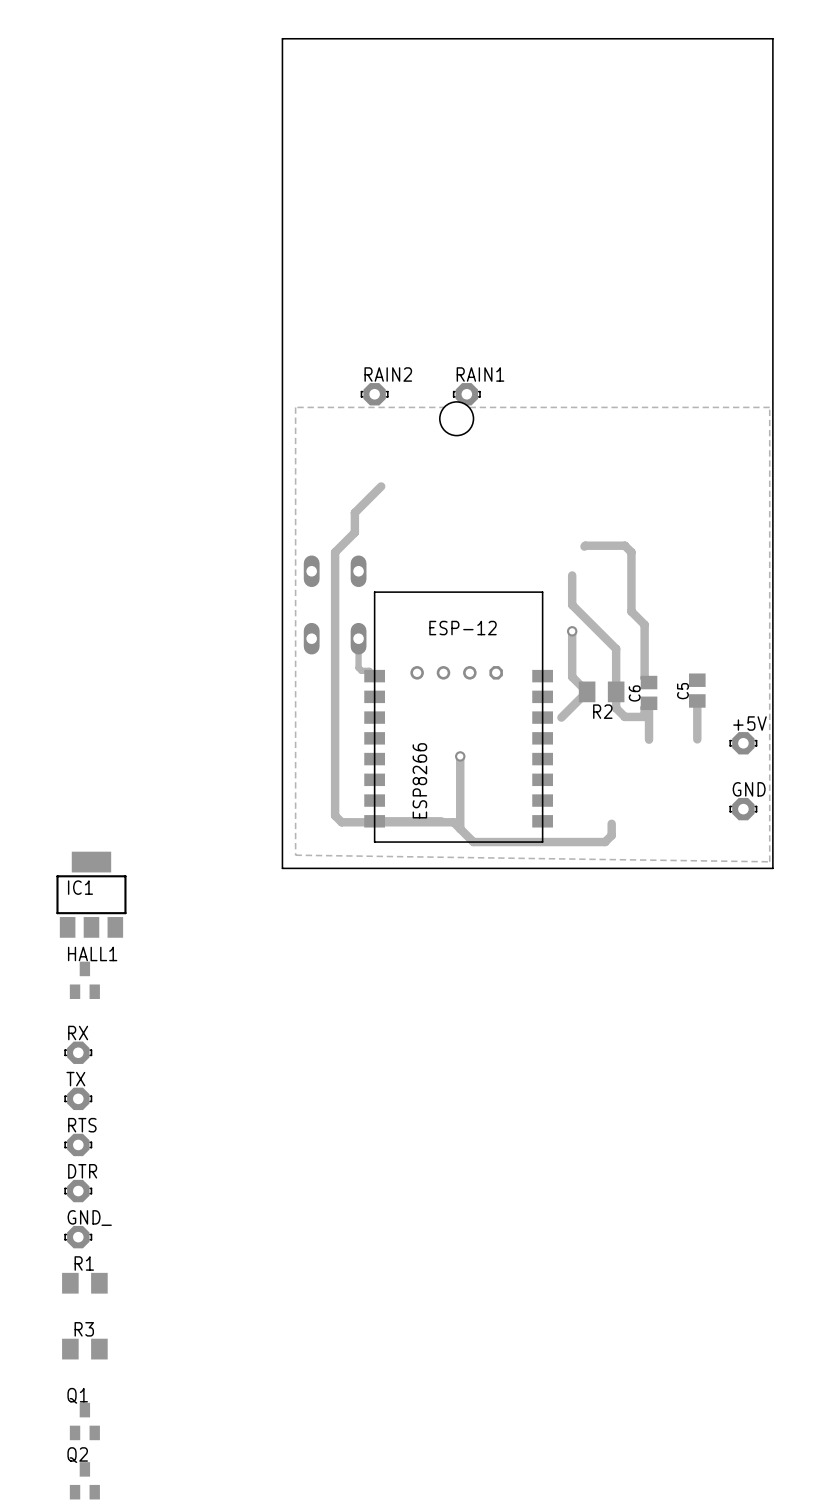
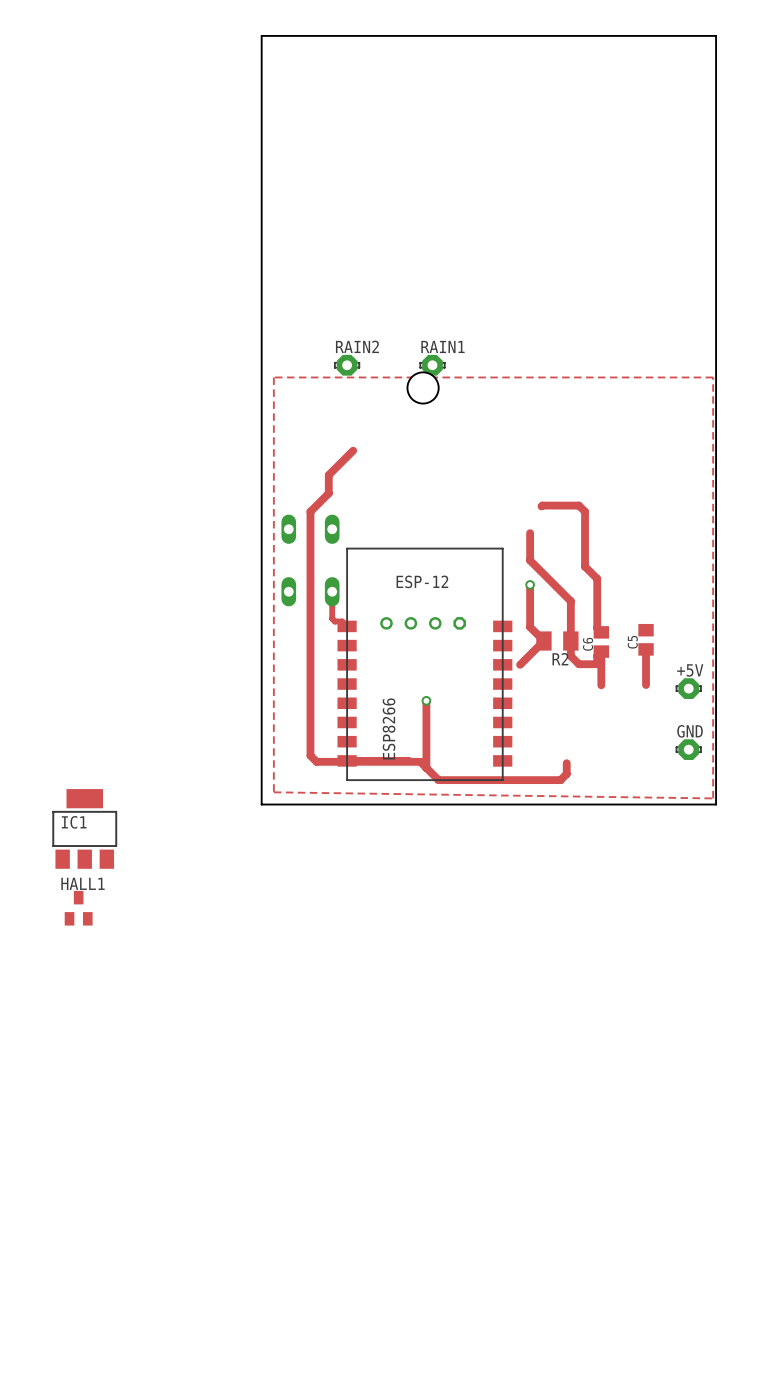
RX: (78, 1052) -> none
TX: (78, 1098) -> none
RTS: (78, 1144) -> none
DTR: (78, 1191) -> none
GND_: (78, 1237) -> none
R1: (84, 1283) -> none
R3: (84, 1349) -> none
Q1: (84, 1421) -> none
Q2: (84, 1480) -> none

